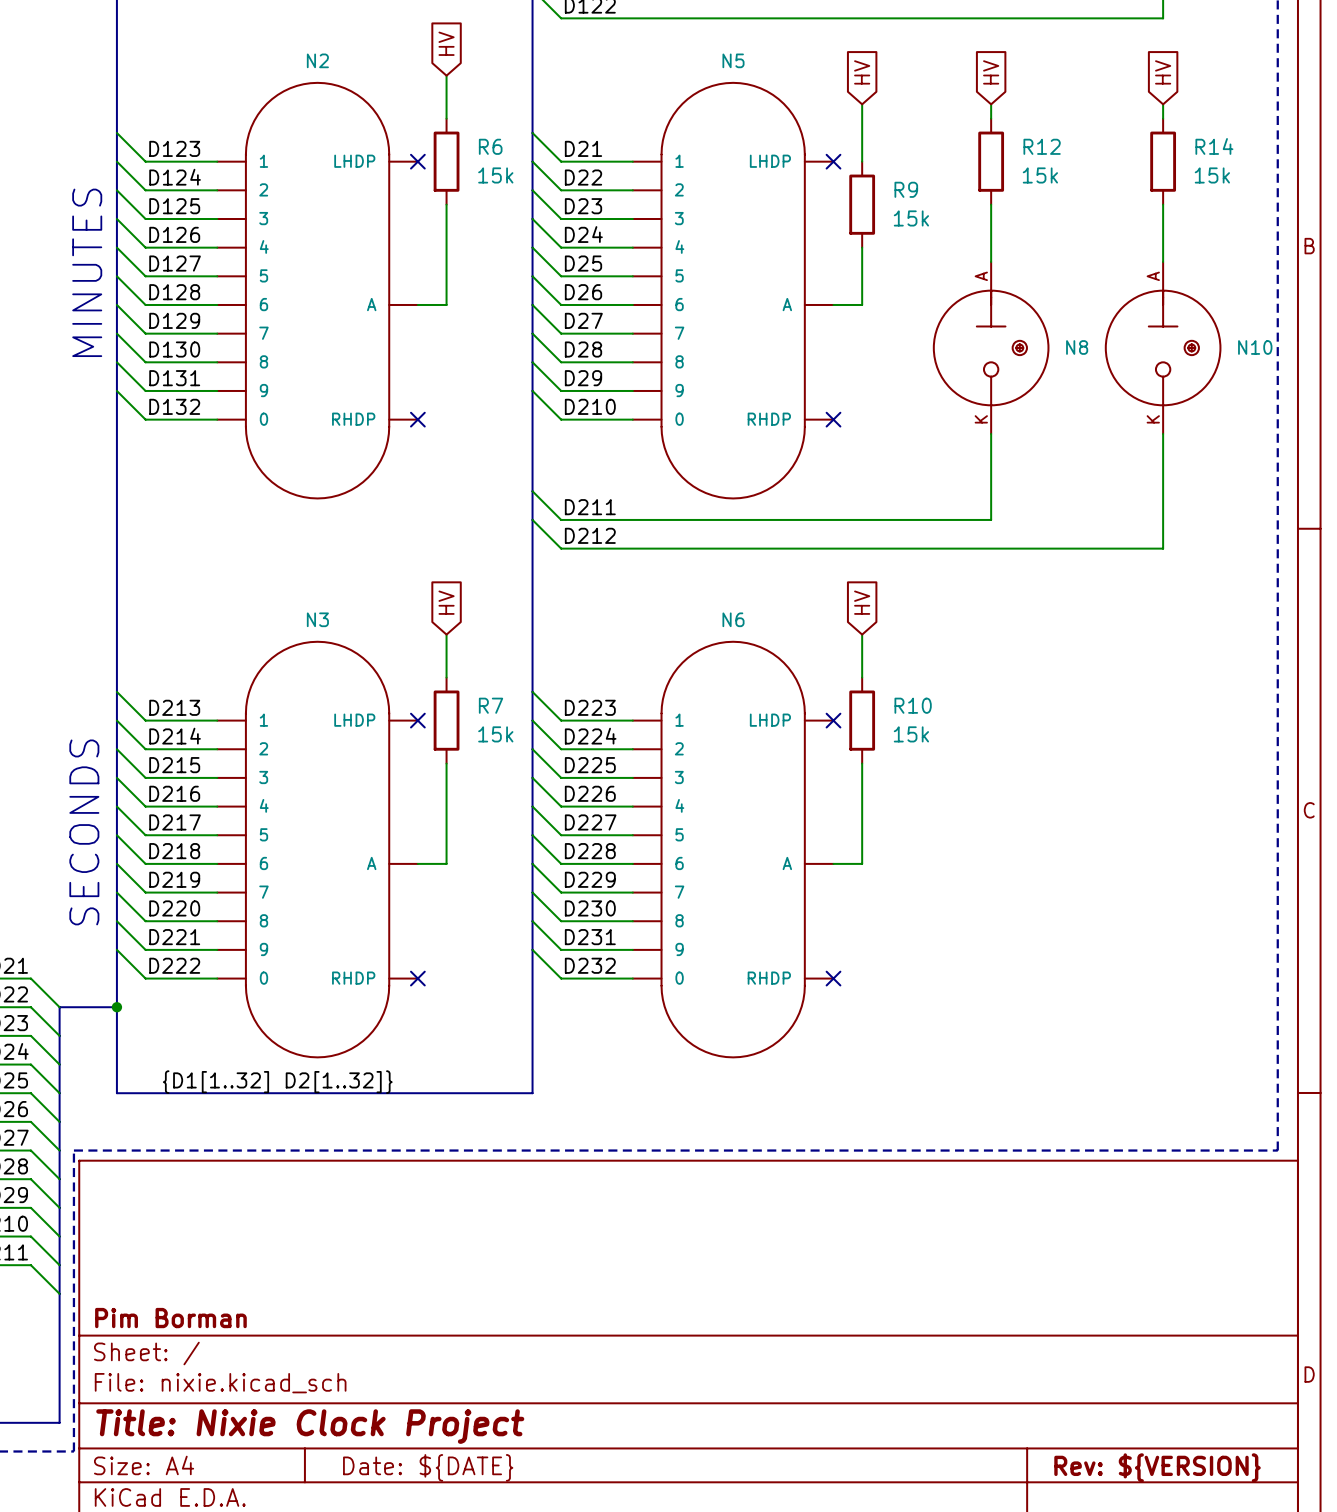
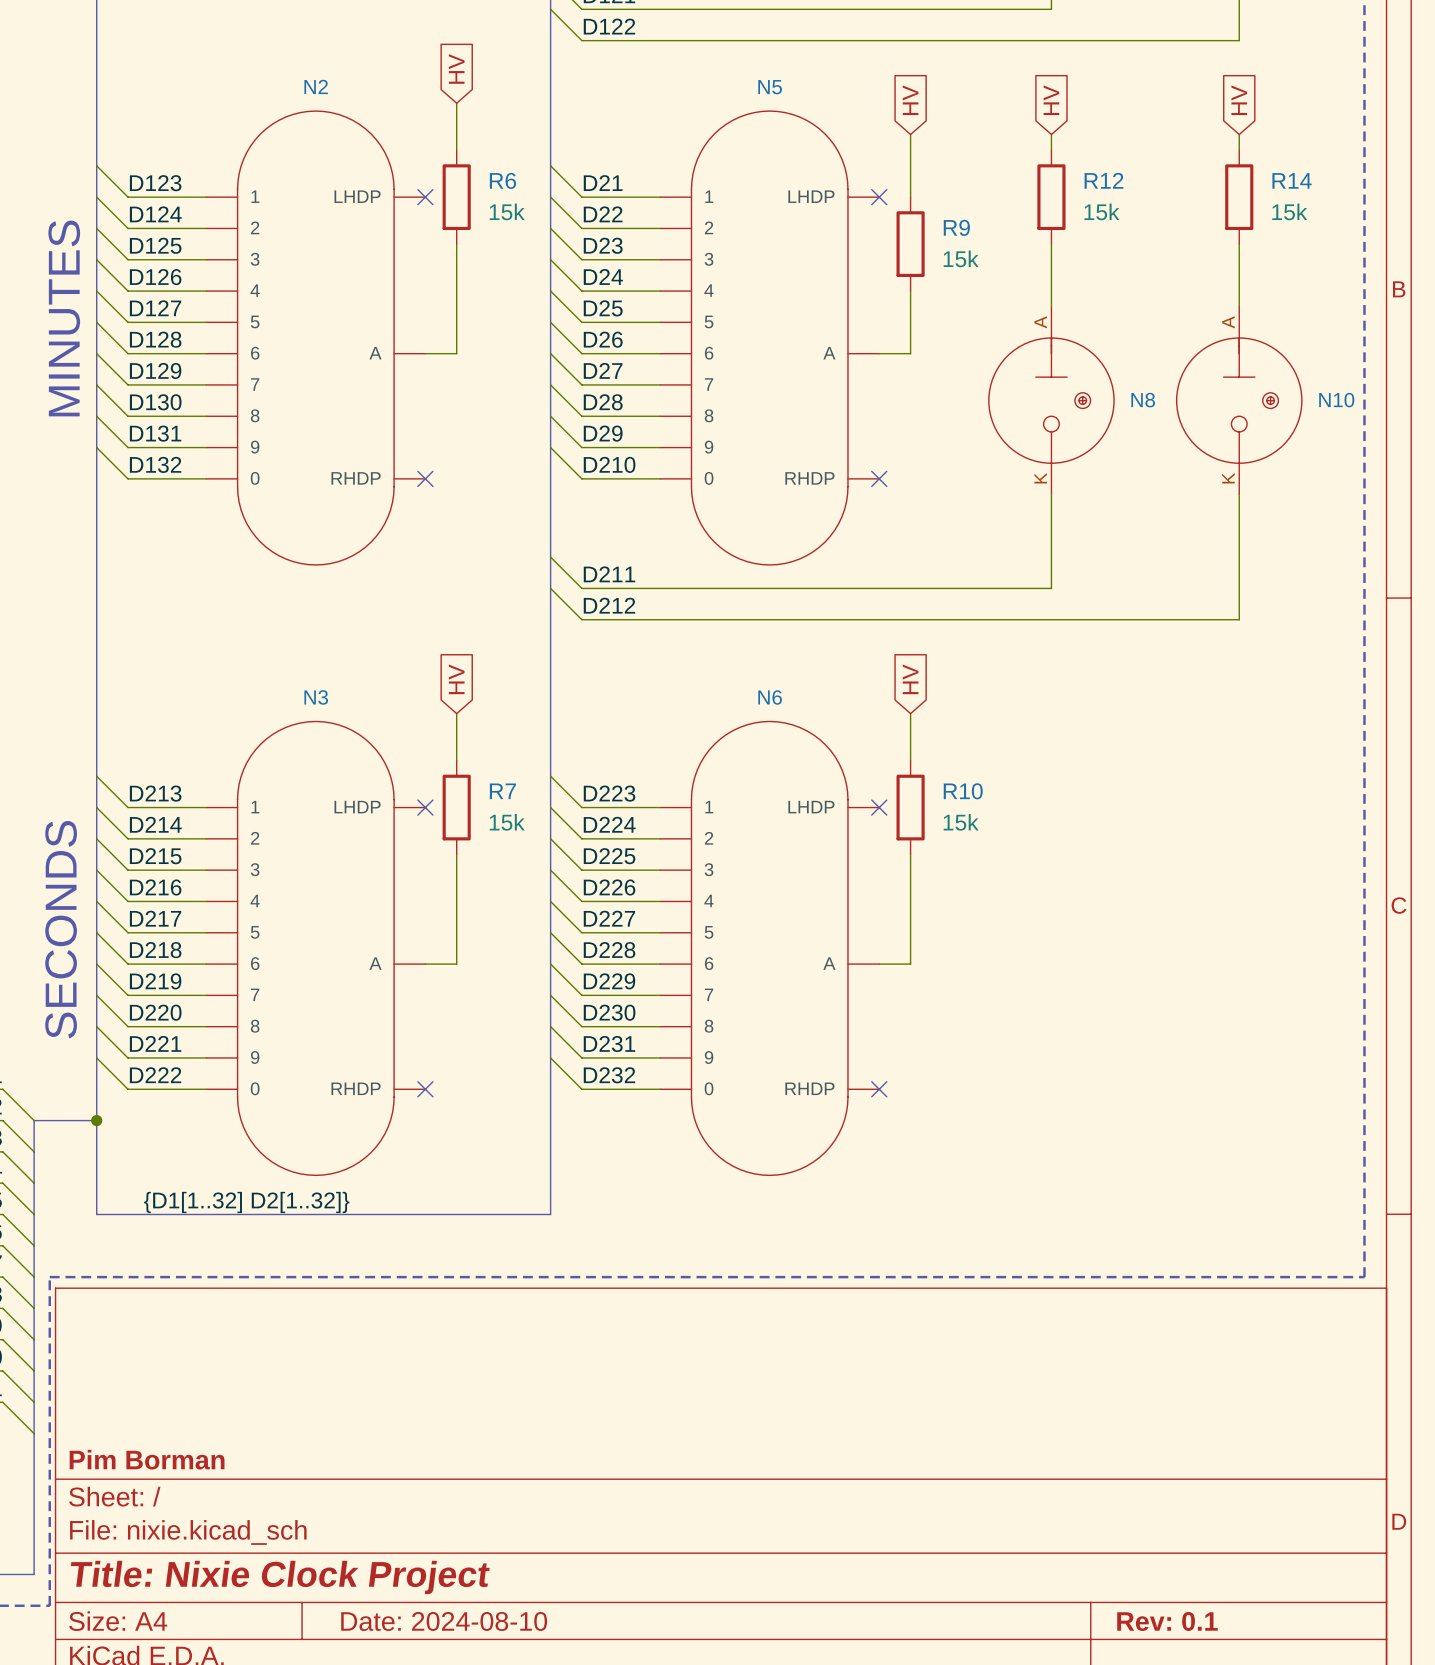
title block: Date: ${DATE} (428, 1467) -> Date: 2024-08-10 (444, 1621)
title block: Rev: ${VERSION} (1157, 1467) -> Rev: 0.1 (1167, 1621)

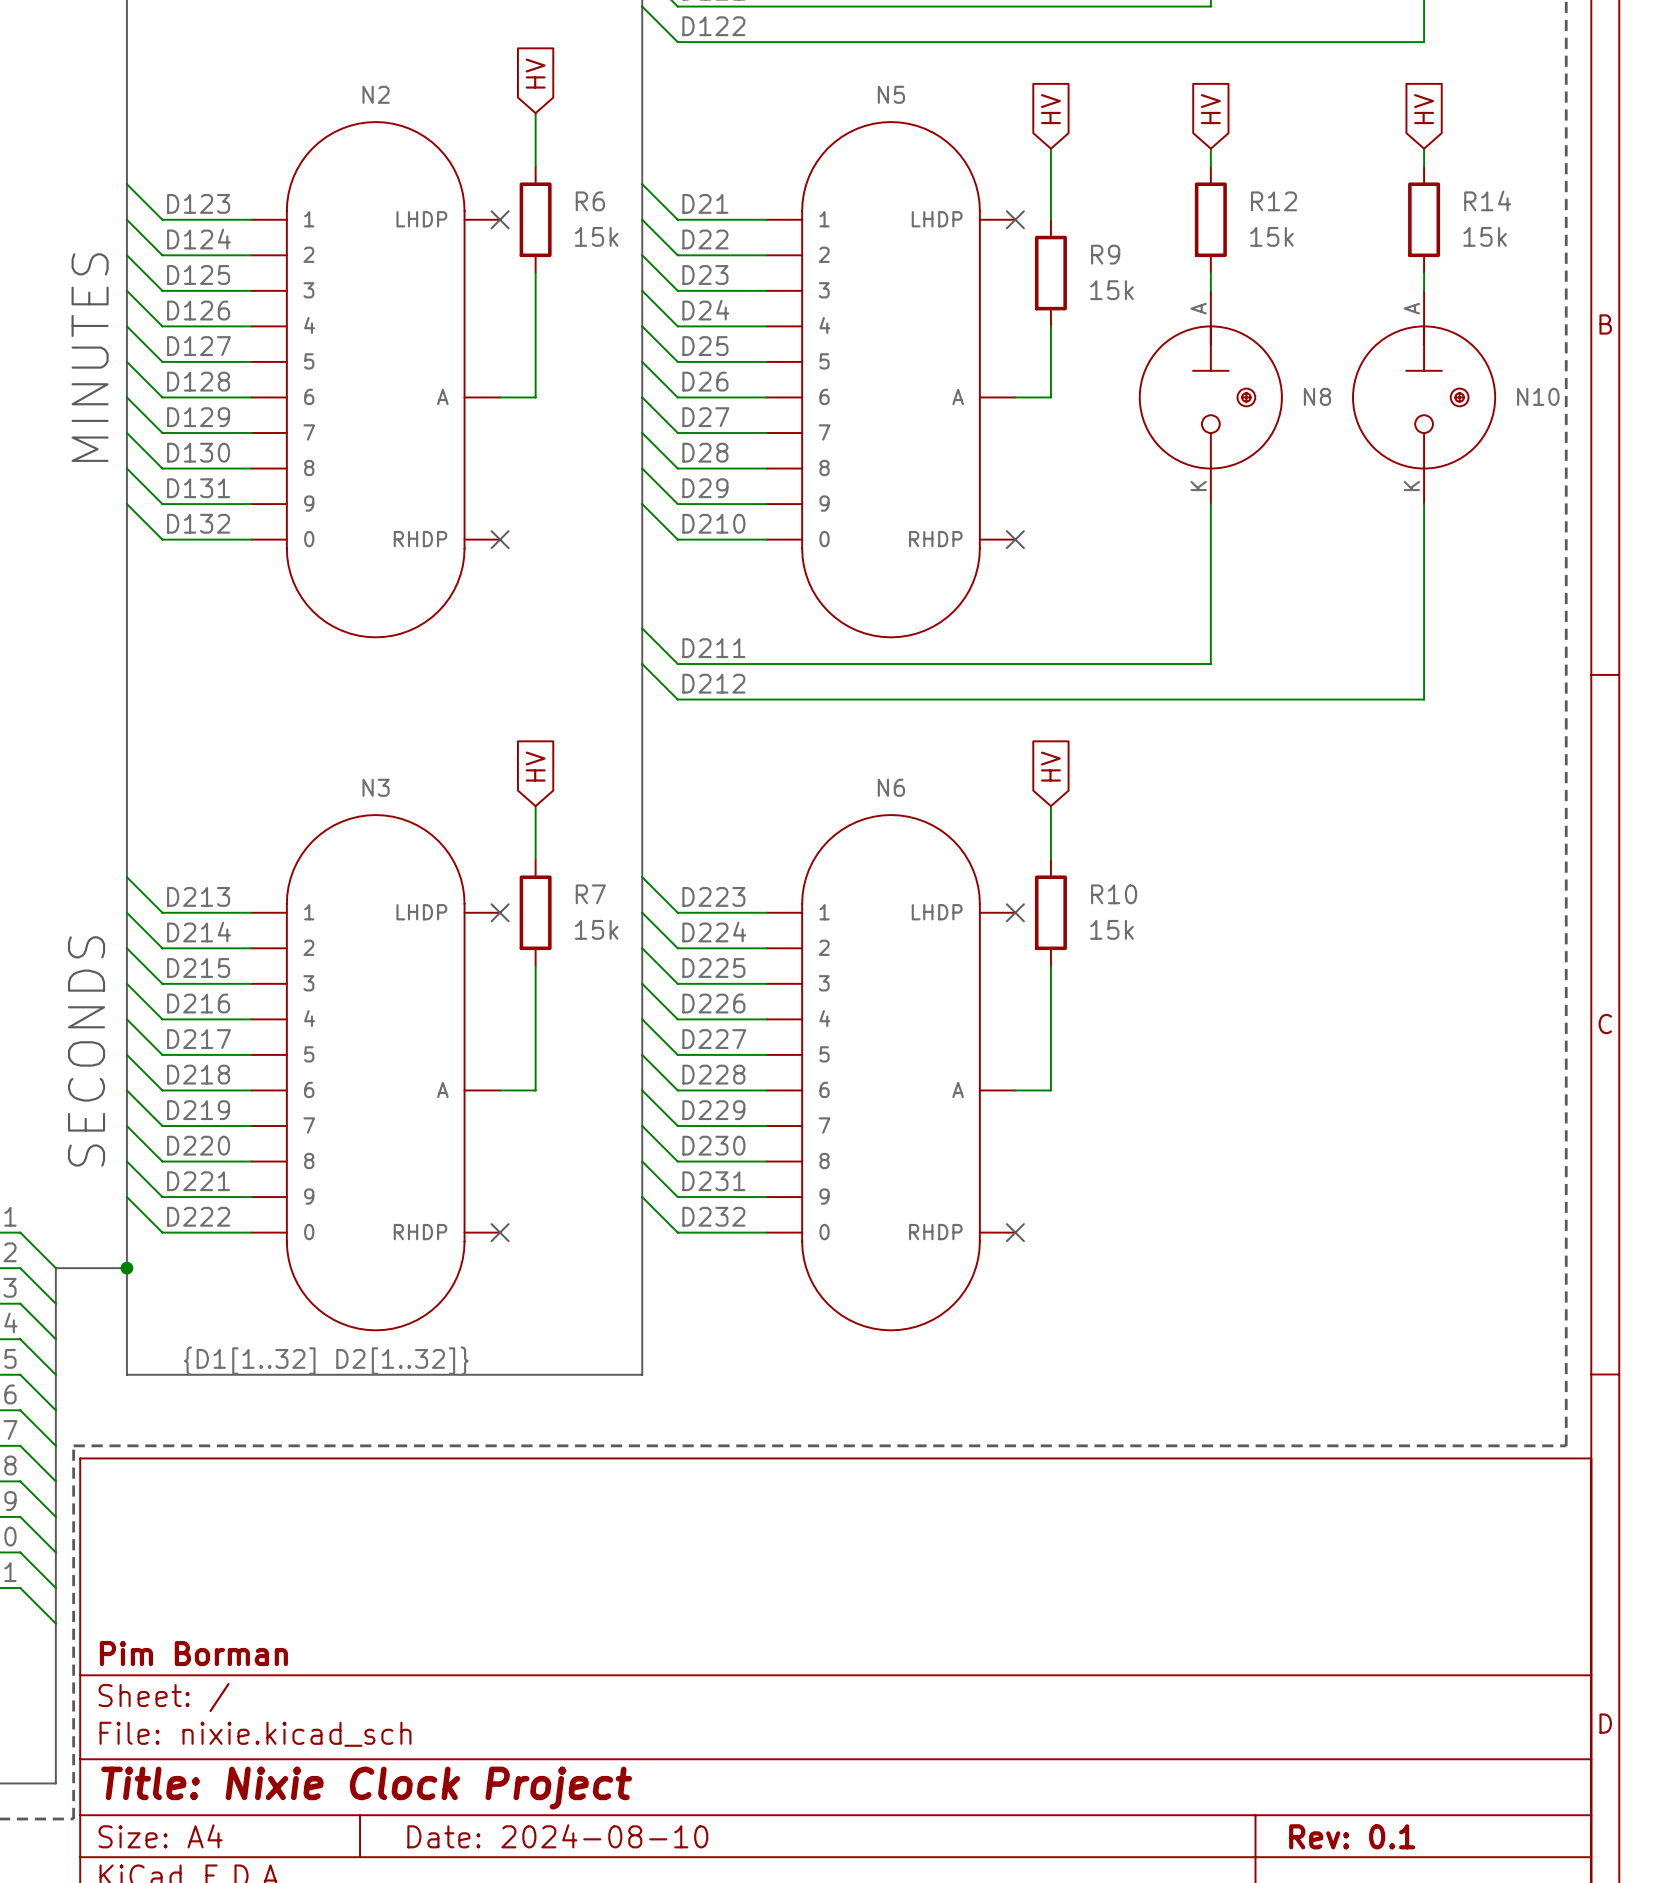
N8 position: (1051, 400) -> (1210, 397)
N10 position: (1239, 400) -> (1424, 397)

